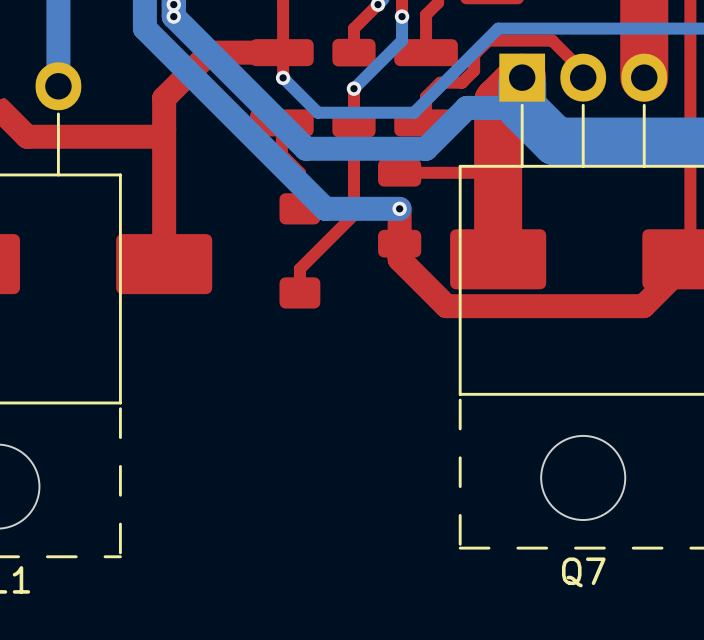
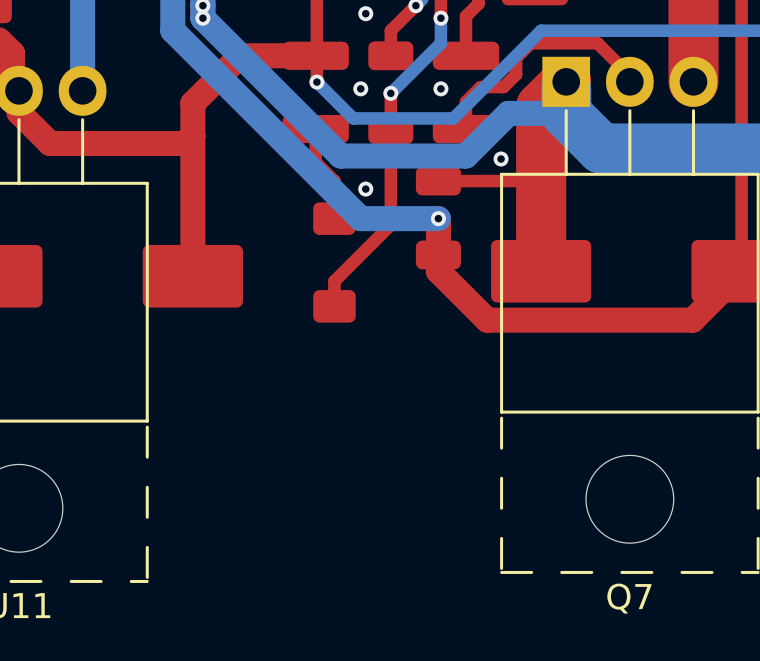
via: none -> (365, 13)
via: none -> (360, 88)
via: none -> (440, 88)
via: none -> (501, 159)
via: none -> (365, 189)

